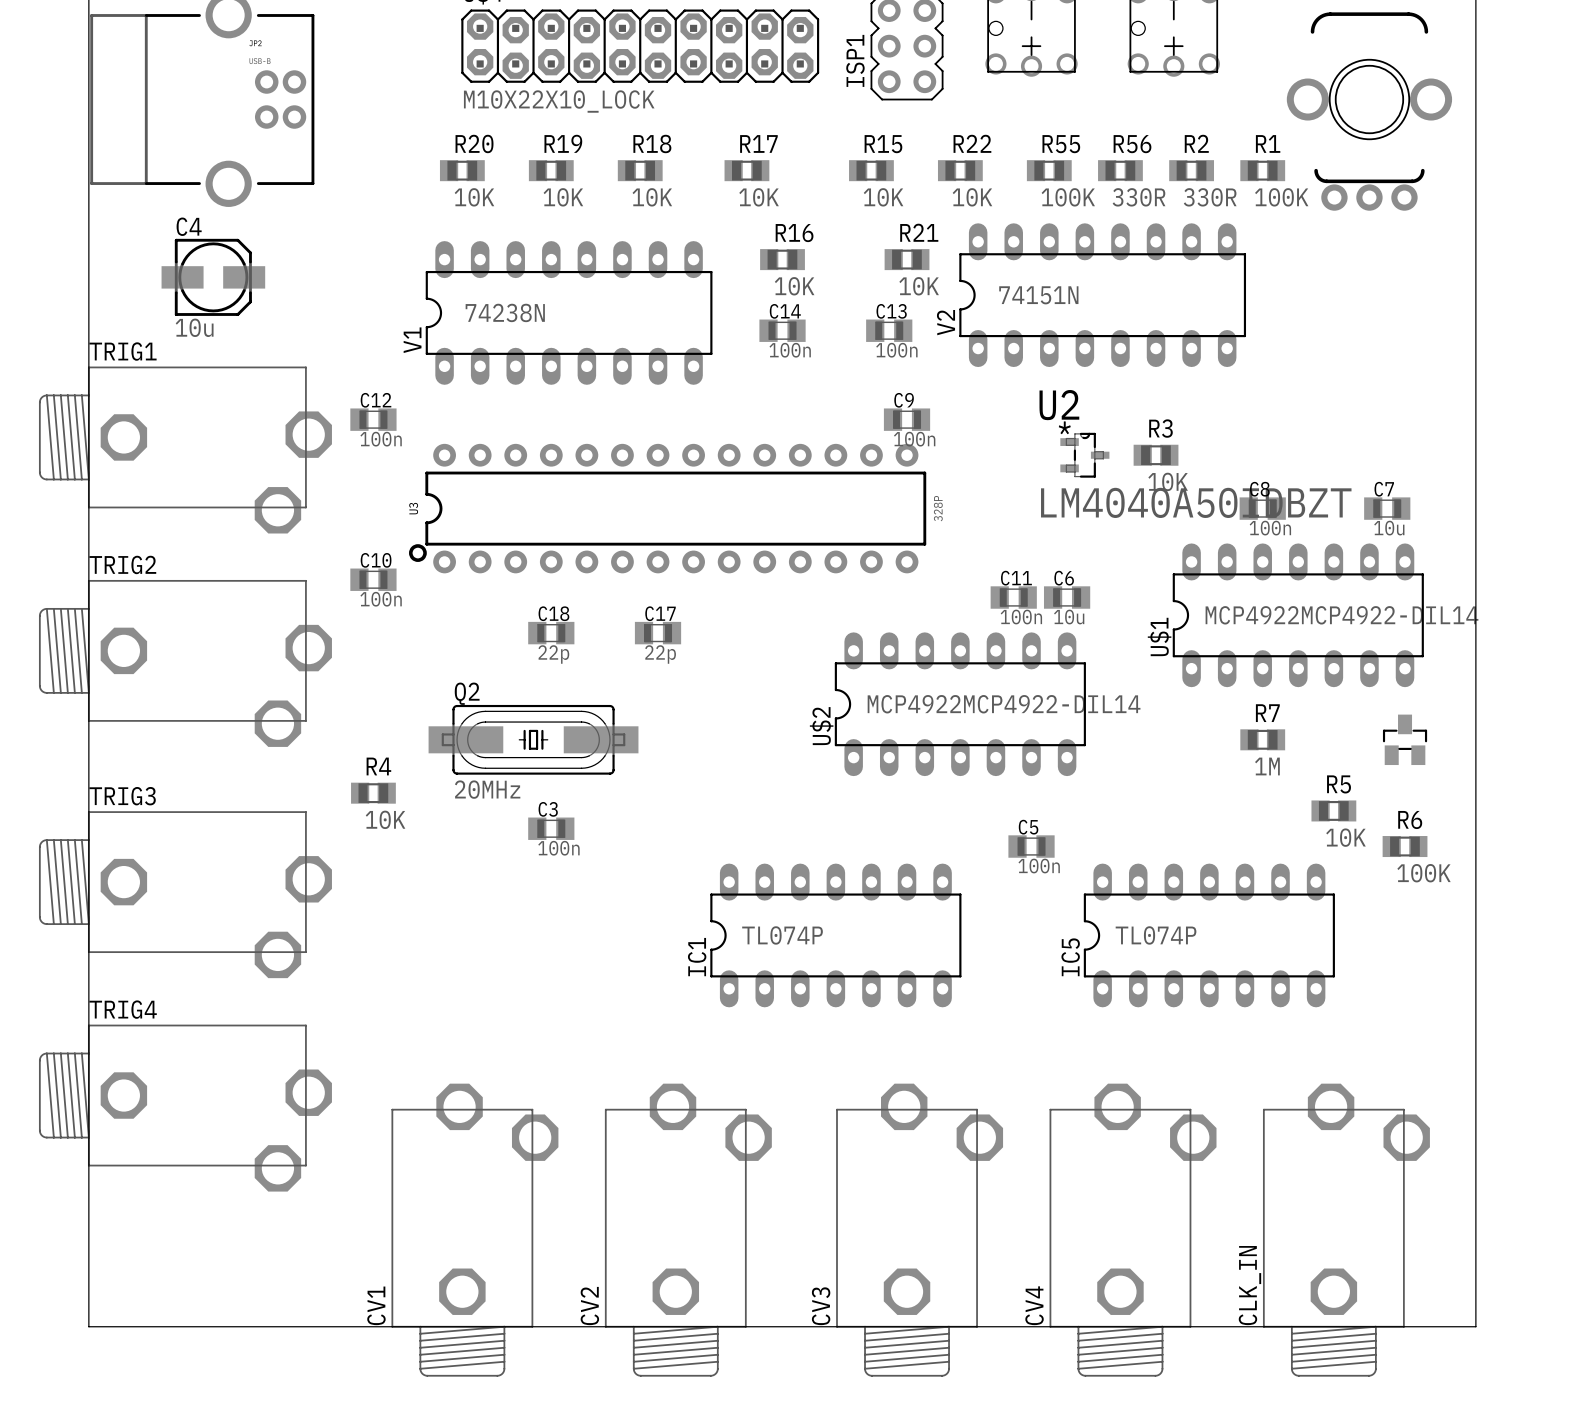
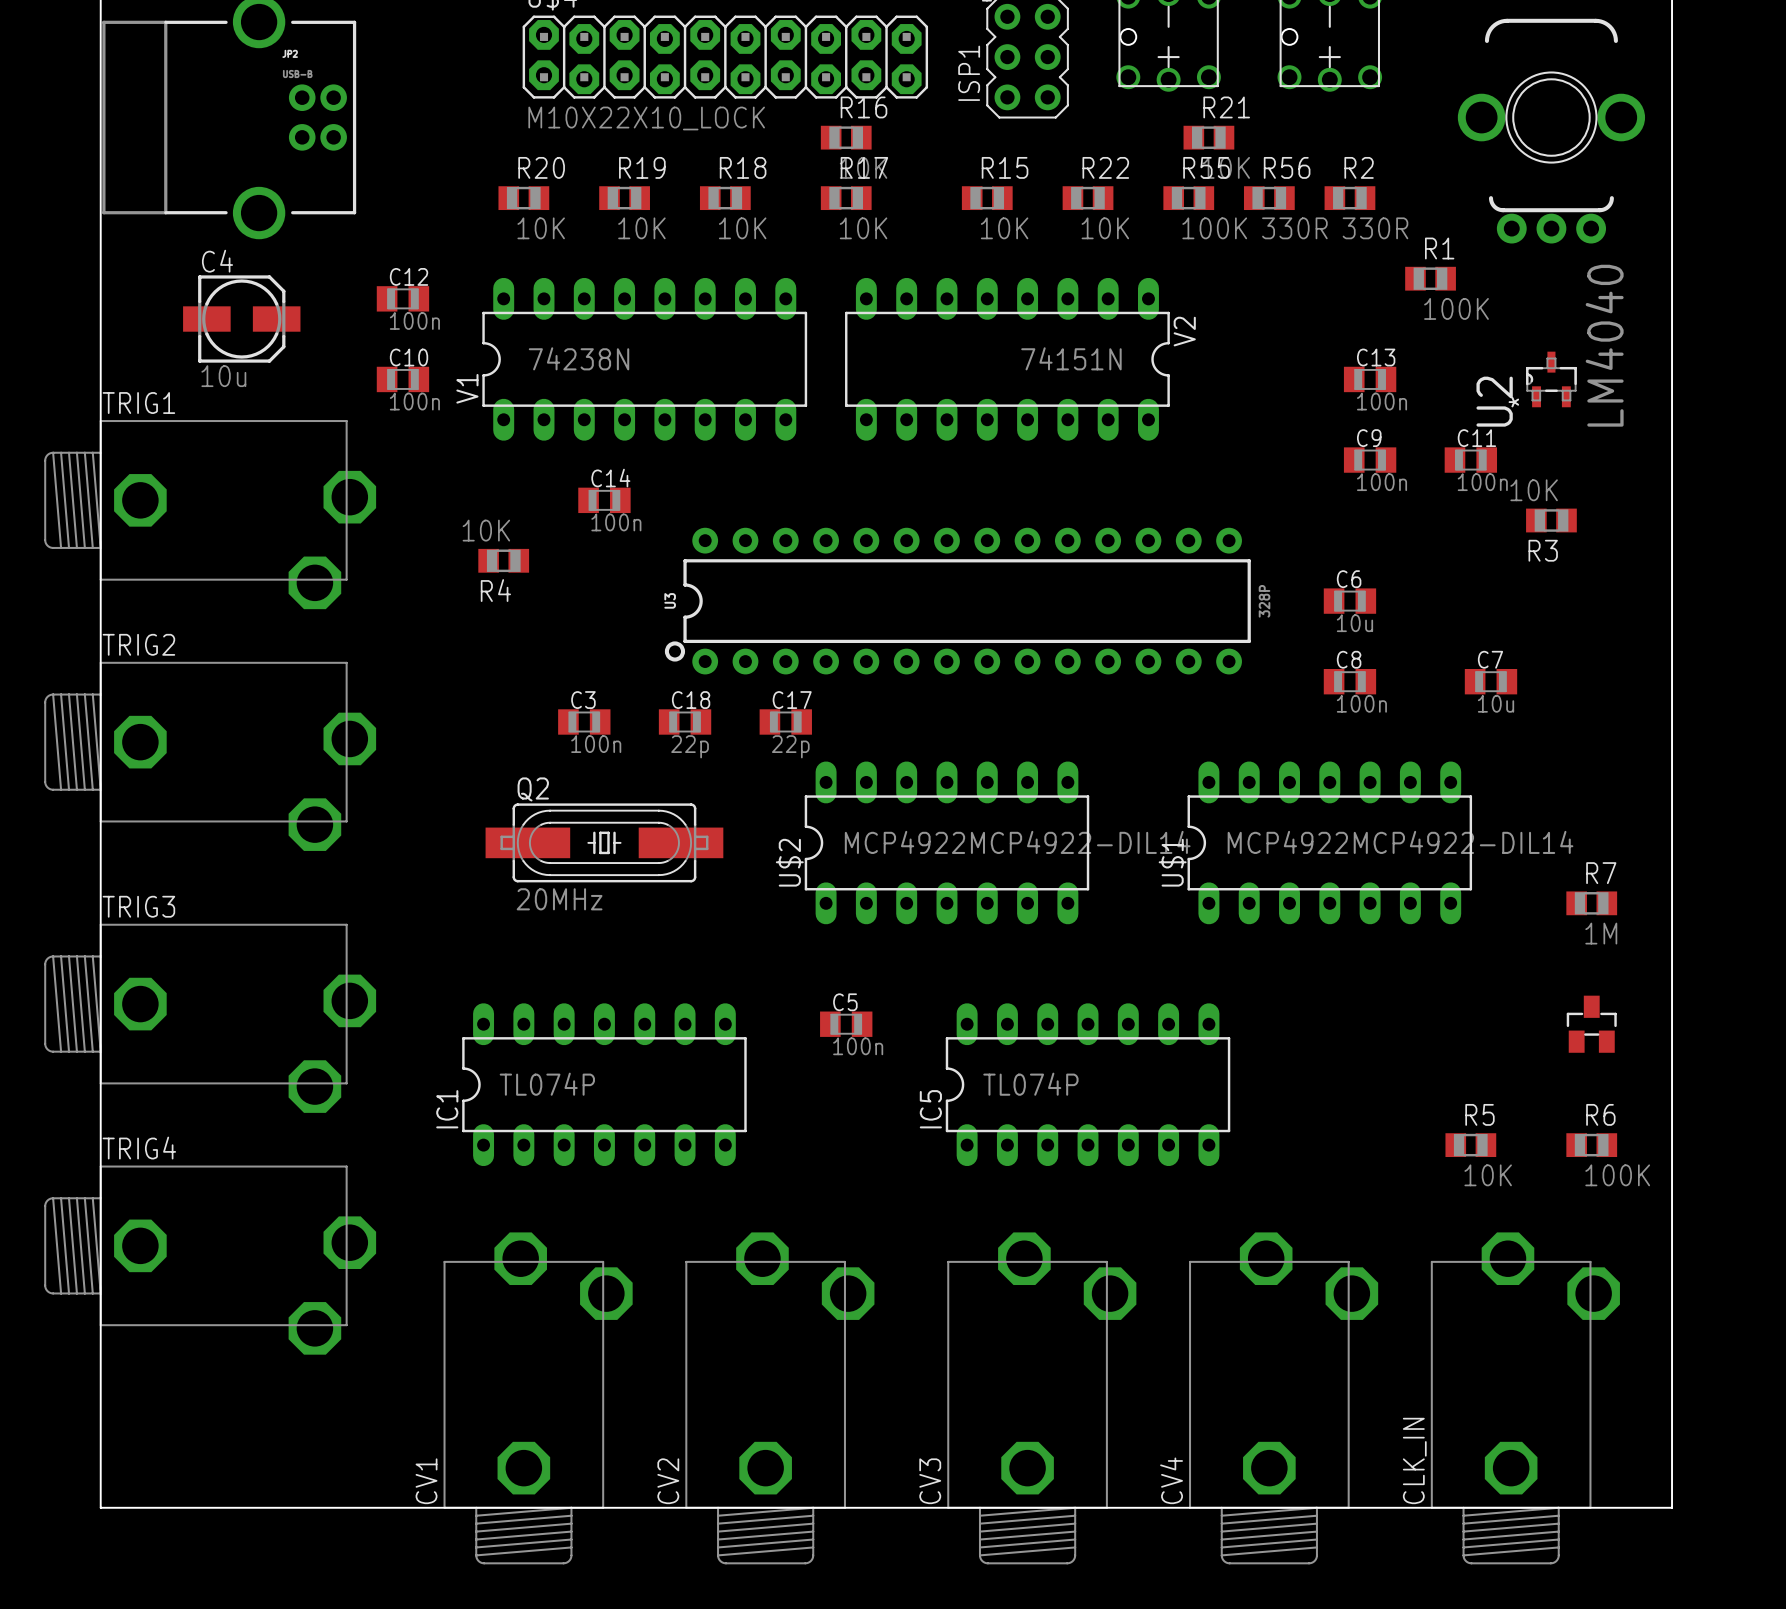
R1 position: (1262, 170) -> (1430, 278)
R16 position: (782, 259) -> (846, 137)
R21 position: (907, 259) -> (1208, 137)
V2 rotation: 0° (1102, 295) -> 180° (1007, 359)
V2 position: (1102, 295) -> (1007, 359)
C14 position: (782, 330) -> (604, 500)
C13 position: (889, 330) -> (1370, 379)
C12 position: (373, 419) -> (402, 298)
C9 position: (907, 419) -> (1370, 460)
R3 name position: R3 (1160, 428) -> R3 (1543, 550)
U2 rotation: 0° (1084, 455) -> 90° counterclockwise (1551, 379)
U2 position: (1084, 455) -> (1551, 379)
R3 position: (1156, 455) -> (1551, 520)
R3 value position: 10K (1168, 481) -> 10K (1534, 490)
U2 value: LM4040A50IDBZT (1196, 502) -> LM4040 (1604, 345)
U3 position: (667, 508) -> (957, 601)
C8 position: (1262, 508) -> (1349, 681)
C7 position: (1387, 508) -> (1490, 681)
C10 position: (373, 579) -> (402, 379)
C11 position: (1013, 597) -> (1470, 460)
C6 position: (1067, 597) -> (1349, 601)
U$1 position: (1298, 615) -> (1329, 842)
C18 position: (551, 633) -> (685, 721)
C17 position: (658, 633) -> (785, 721)
U$2 position: (960, 704) -> (946, 842)
R7 position: (1262, 739) -> (1591, 903)
part position: (1405, 739) -> (1591, 1024)
R4 name position: R4 (378, 766) -> R4 (495, 590)
R4 position: (373, 793) -> (503, 560)
R5 position: (1333, 810) -> (1470, 1145)
R4 value position: 10K (385, 819) -> 10K (486, 530)
C3 position: (551, 828) -> (584, 721)
C5 position: (1031, 846) -> (846, 1024)
R6 position: (1405, 846) -> (1591, 1145)
IC1 position: (835, 935) -> (604, 1084)
IC5 position: (1209, 935) -> (1088, 1084)

